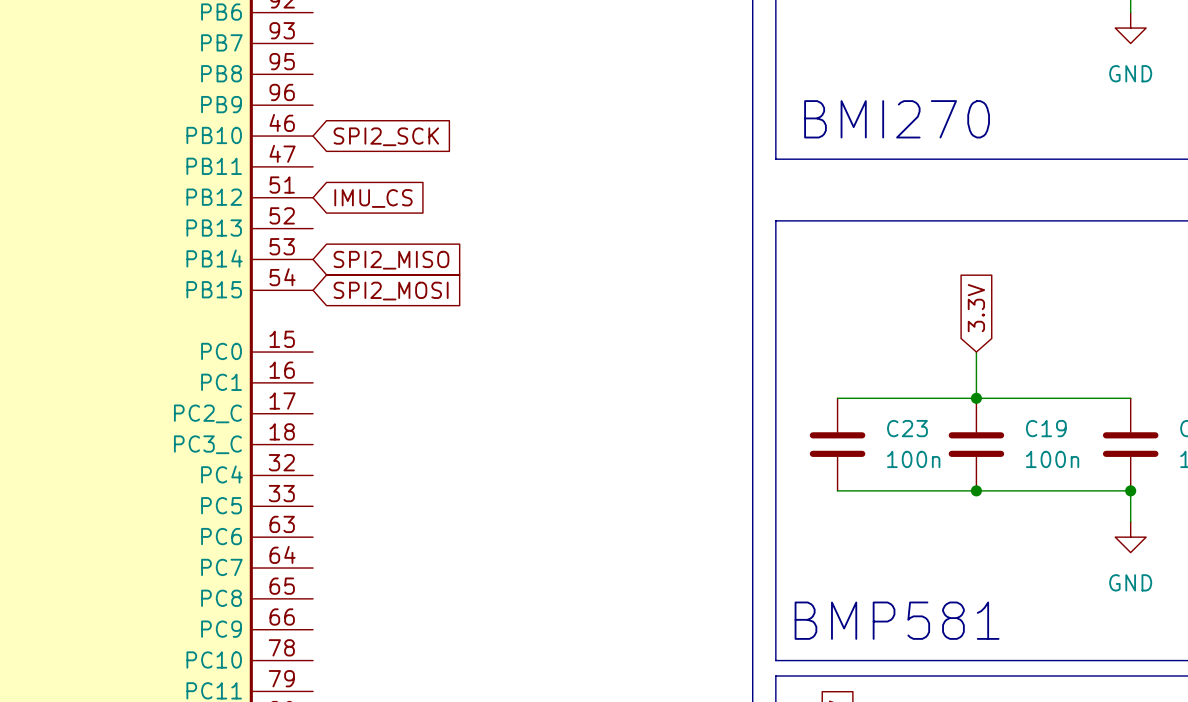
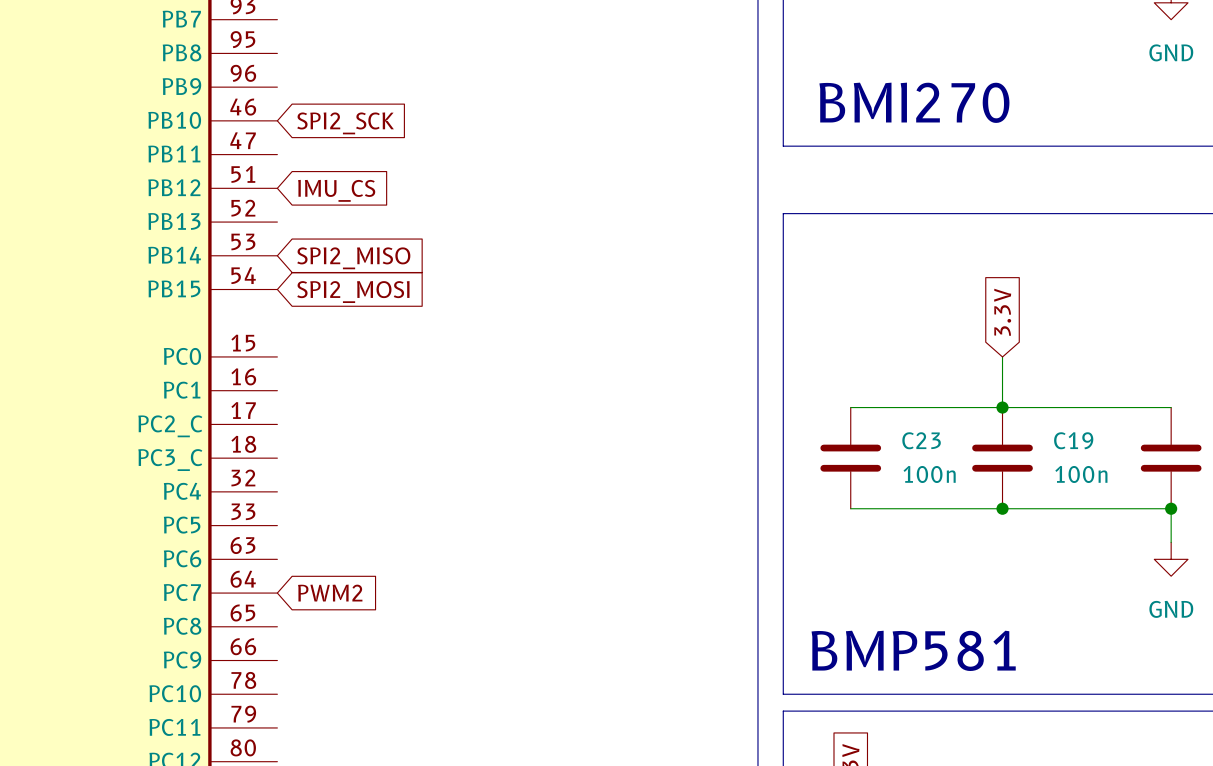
global label: none -> PWM2 (330, 593)

